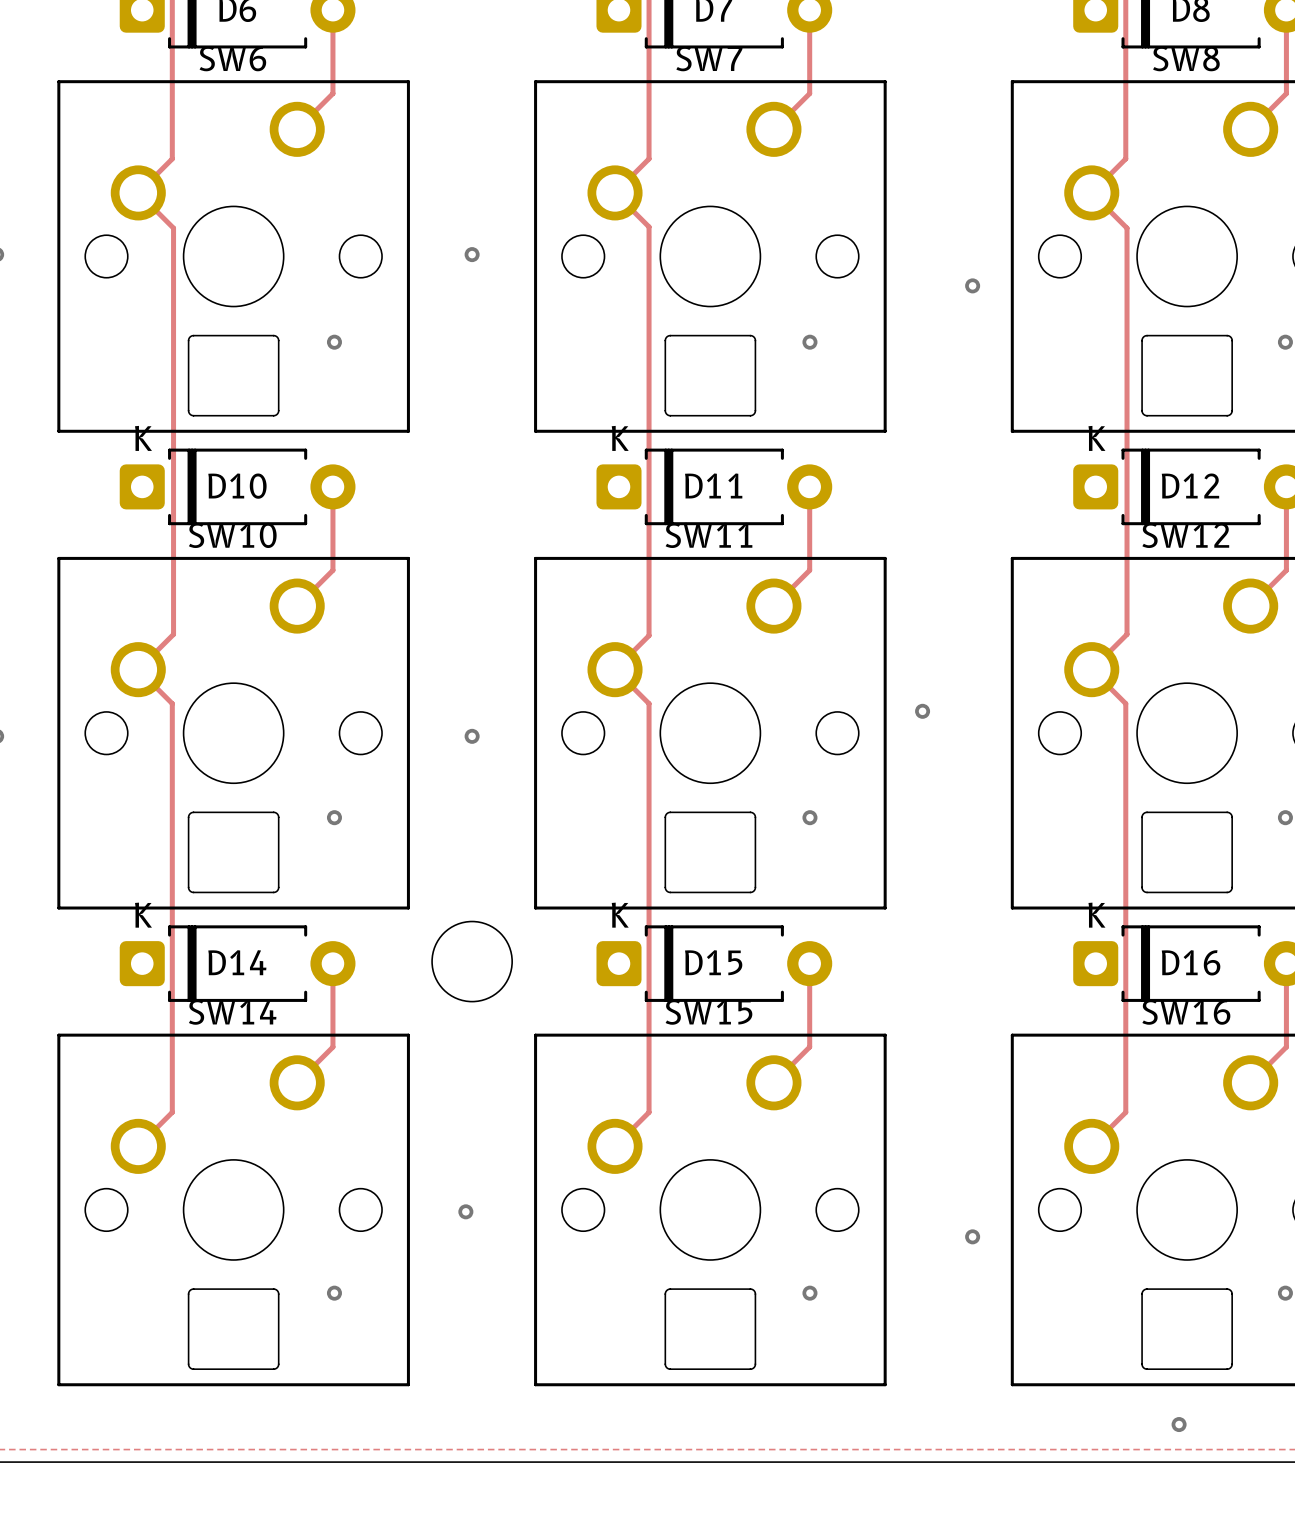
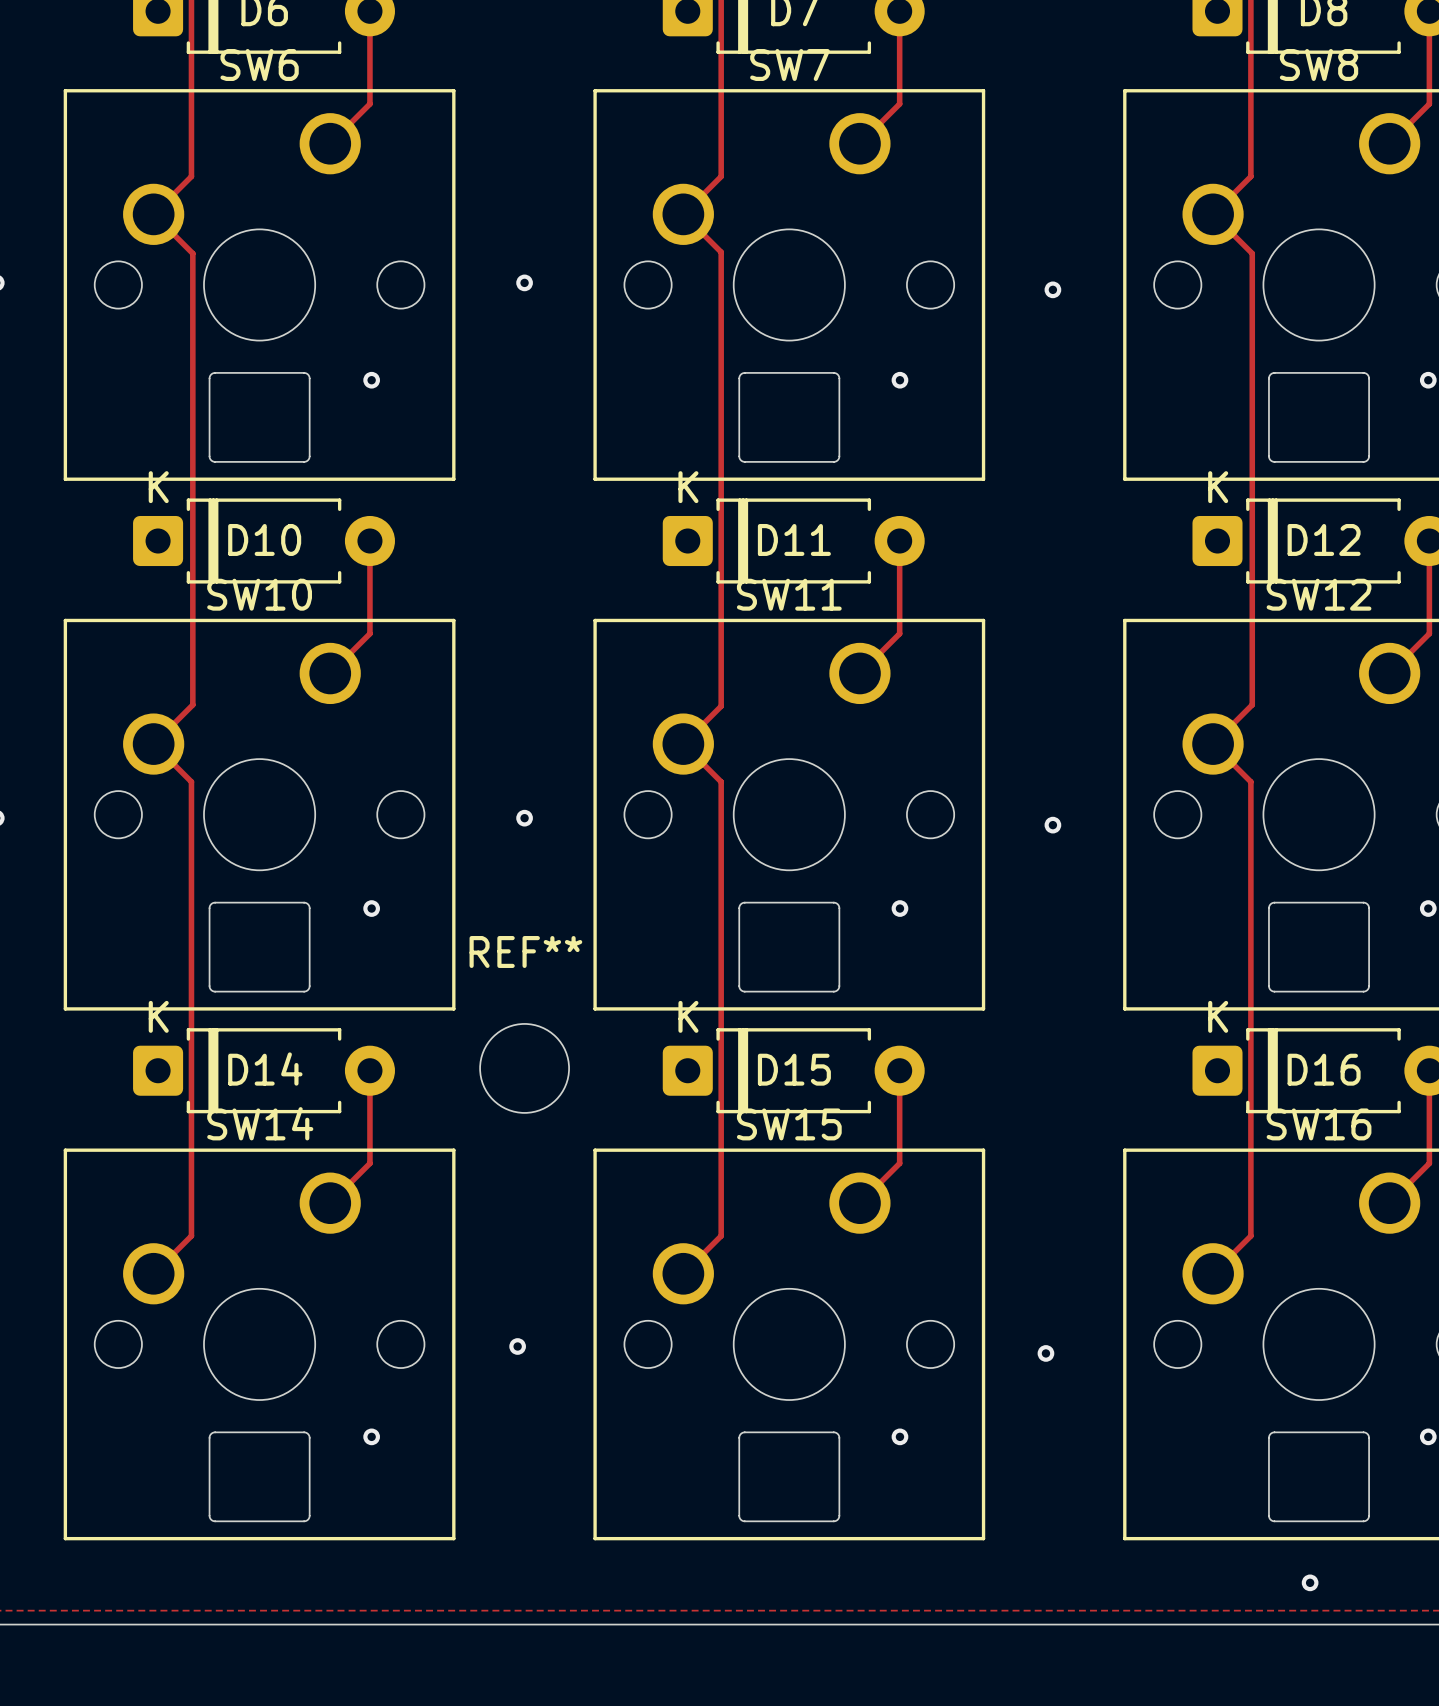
via position: (972, 285) -> (1052, 289)
via position: (922, 711) -> (1052, 825)
REF** name: none -> REF** (525, 951)
via position: (972, 1236) -> (1045, 1353)

